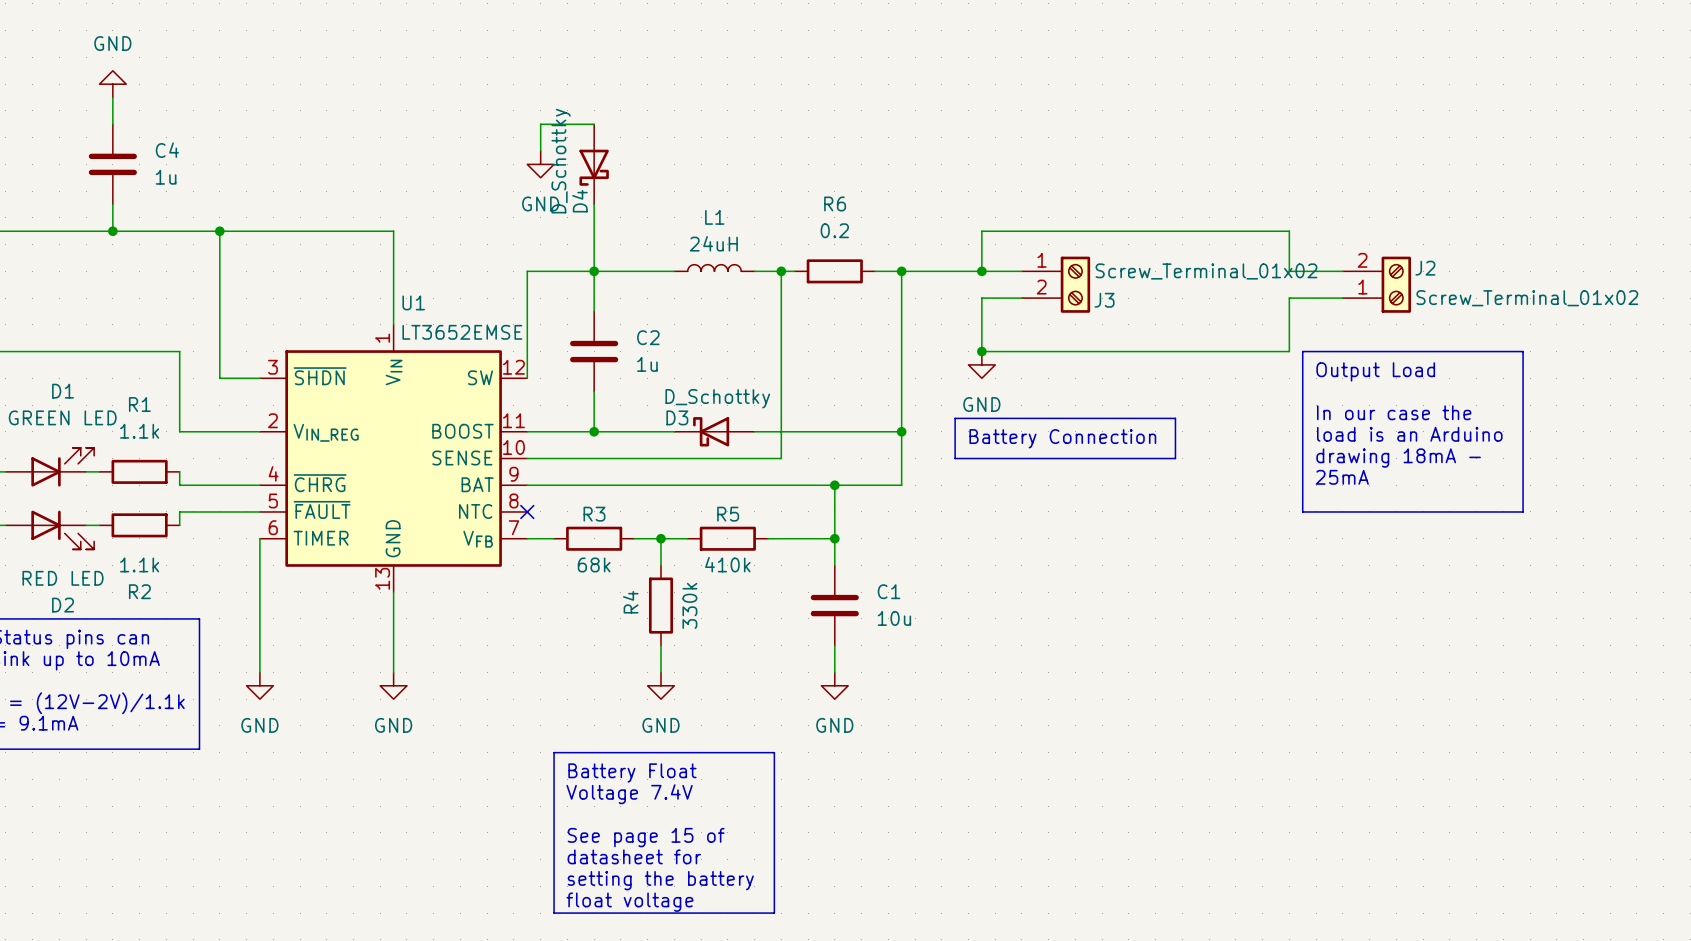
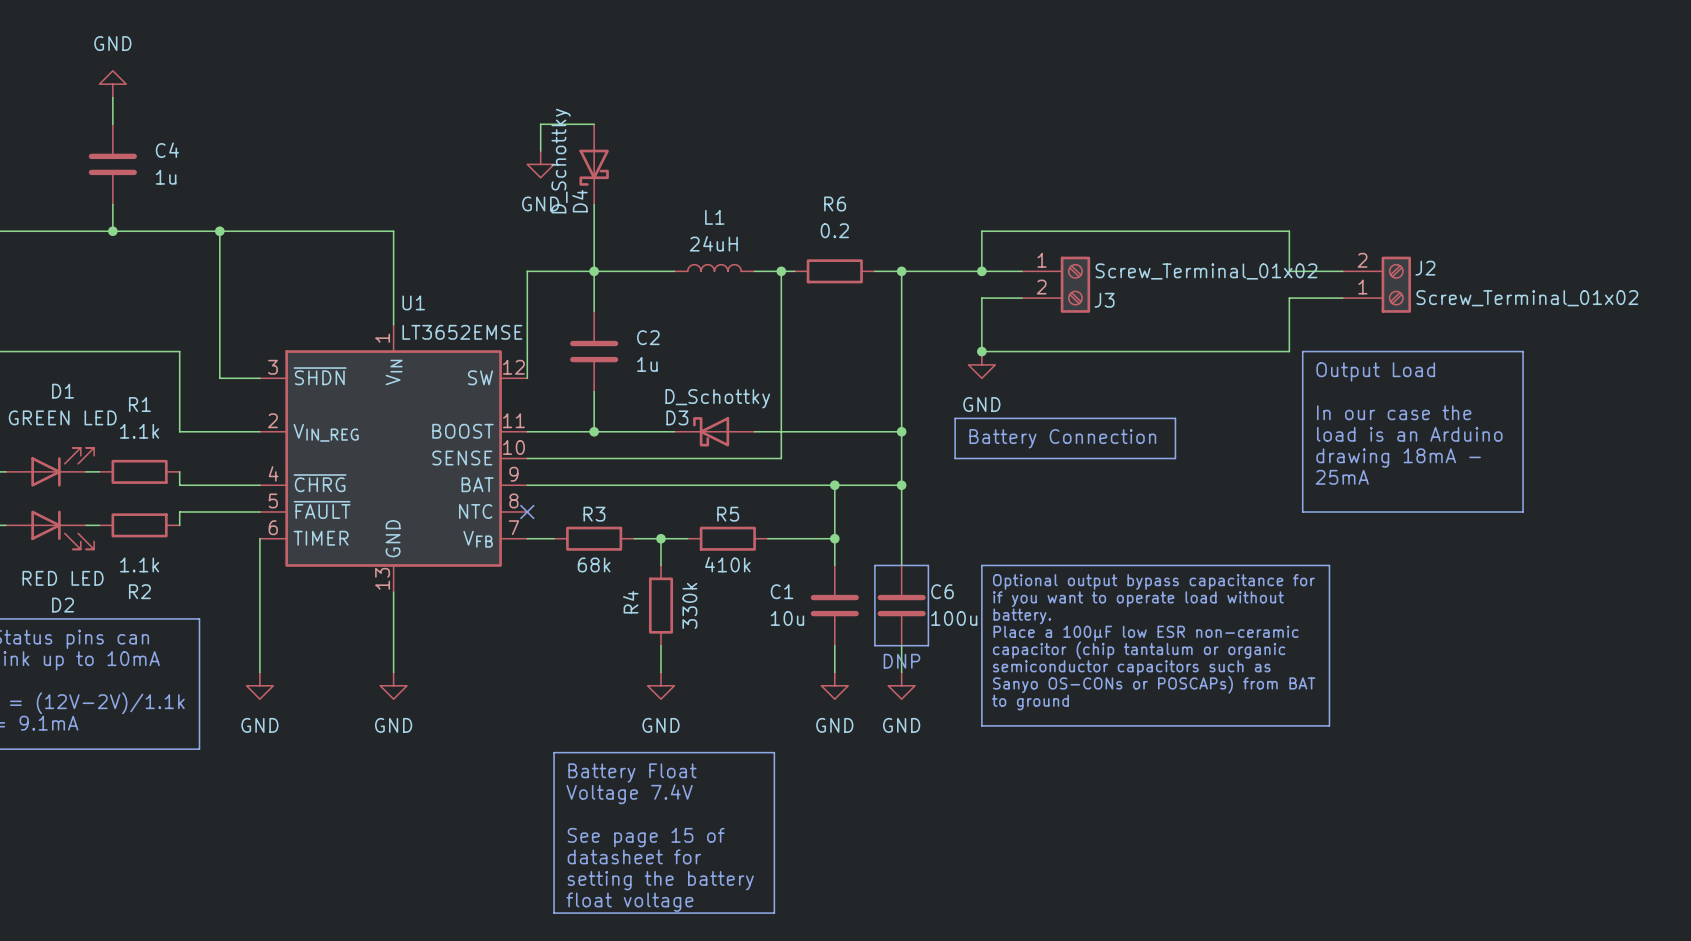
wire: none -> (901, 485) (901, 565)
junction: none -> (901, 485)
line: none -> (874, 565) (928, 565) (928, 645) (874, 645) (874, 565)
line: none -> (981, 565) (1329, 565) (1329, 725) (981, 725) (981, 565)
text: none -> Optional output bypass capacitance for (1153, 581)
C1 name position: C1 (889, 591) -> C1 (782, 591)
text: none -> if you want to operate load without (1138, 599)
C6: none -> 100u (901, 605)
text: none -> battery. (1022, 616)
C1 value position: 10u (894, 618) -> 10u (787, 618)
text: none -> Place a 100µF low ESR non-ceramic (1146, 633)
wire: none -> (901, 645) (901, 672)
text: none -> capacitor (chip tantalum or organic (1139, 650)
text: none -> DNP (901, 661)
text: none -> semiconductor capacitors such as (1131, 668)
text: none -> Sanyo OS-CONs or POSCAPs) from BAT (1154, 684)
power symbol: none -> GND (901, 685)
text: none -> to ground (1030, 702)

